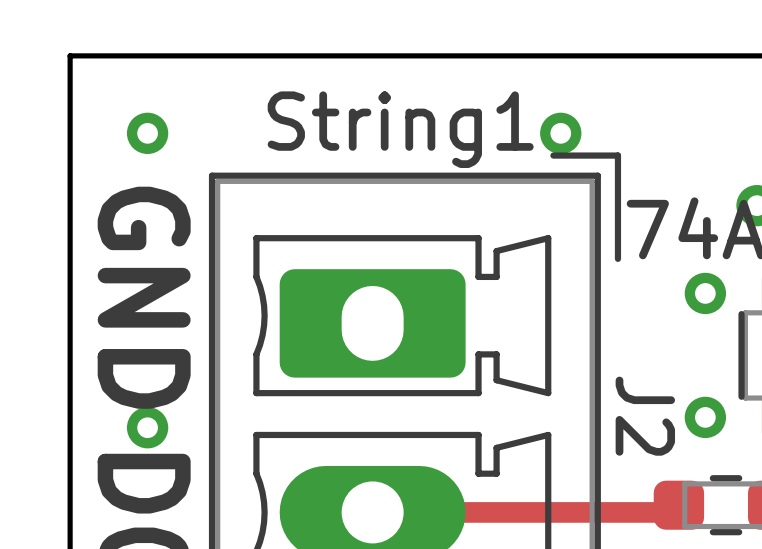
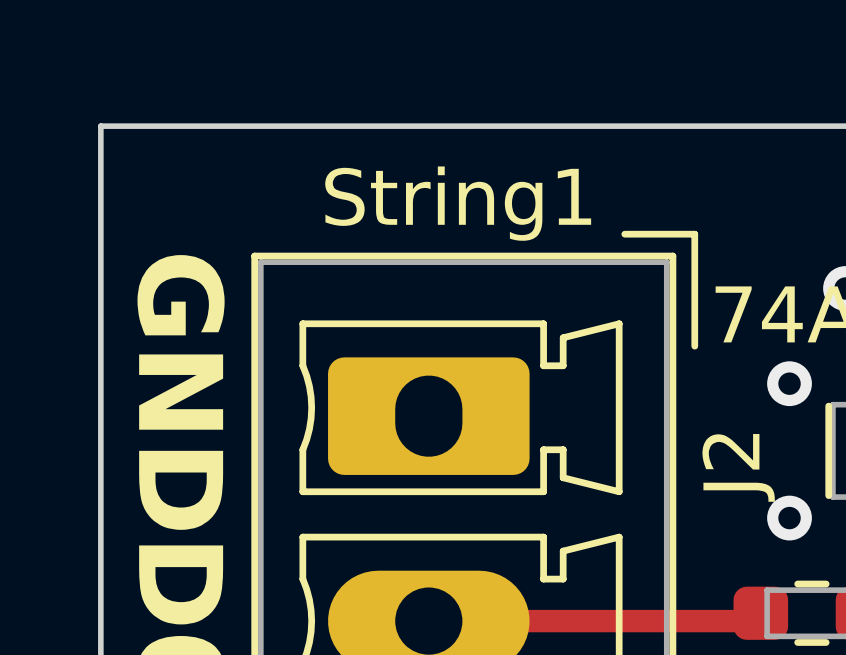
via: (147, 133) -> none
via: (560, 133) -> none
J2 name rotation: 0° (645, 416) -> 180° (738, 467)
via: (147, 427) -> none

